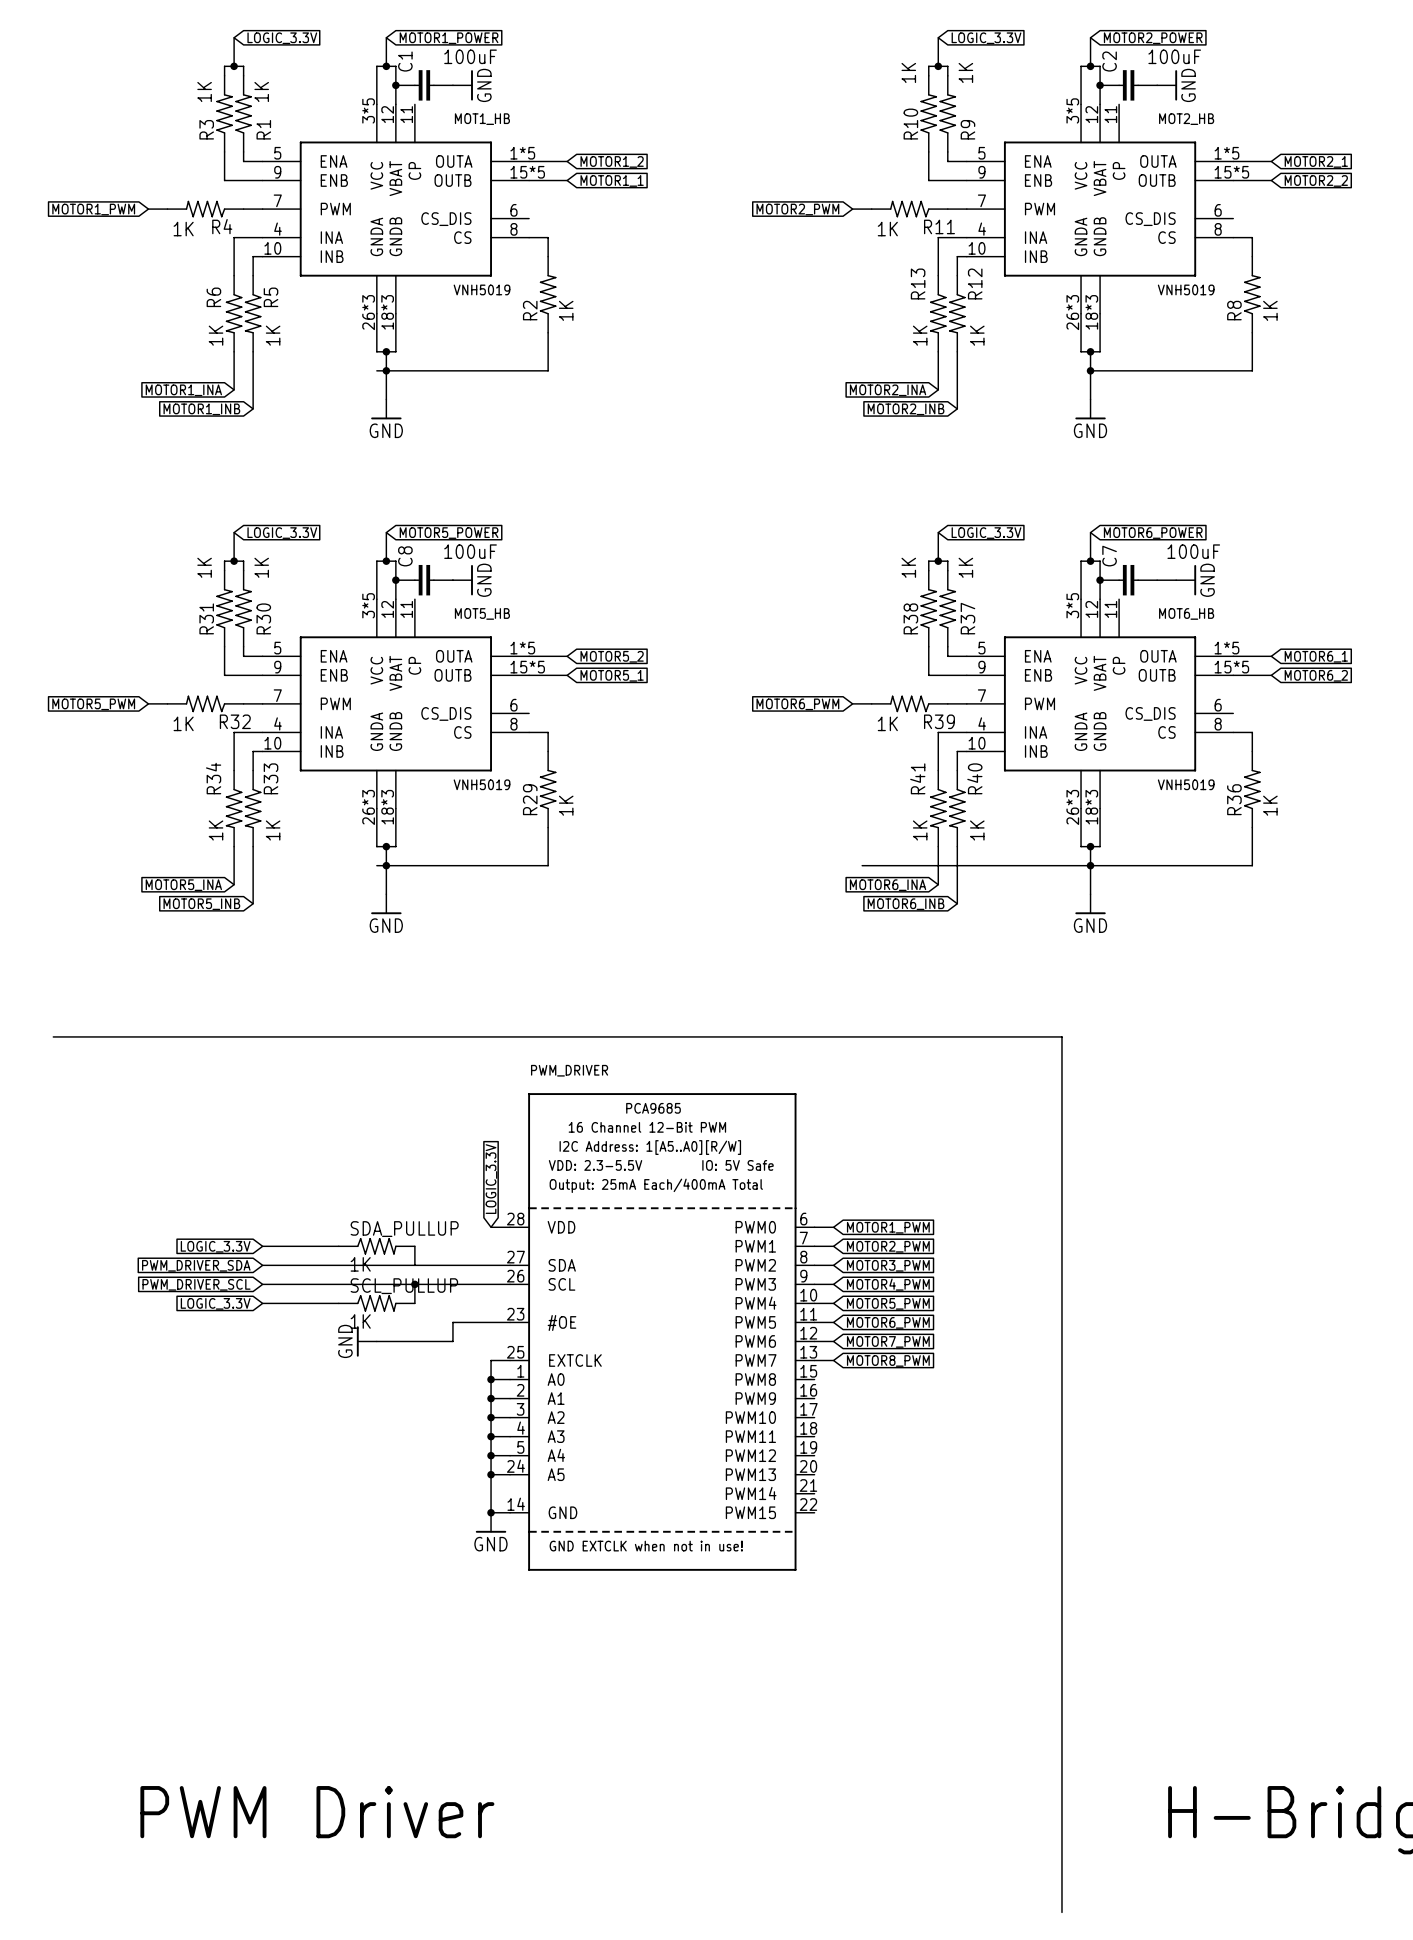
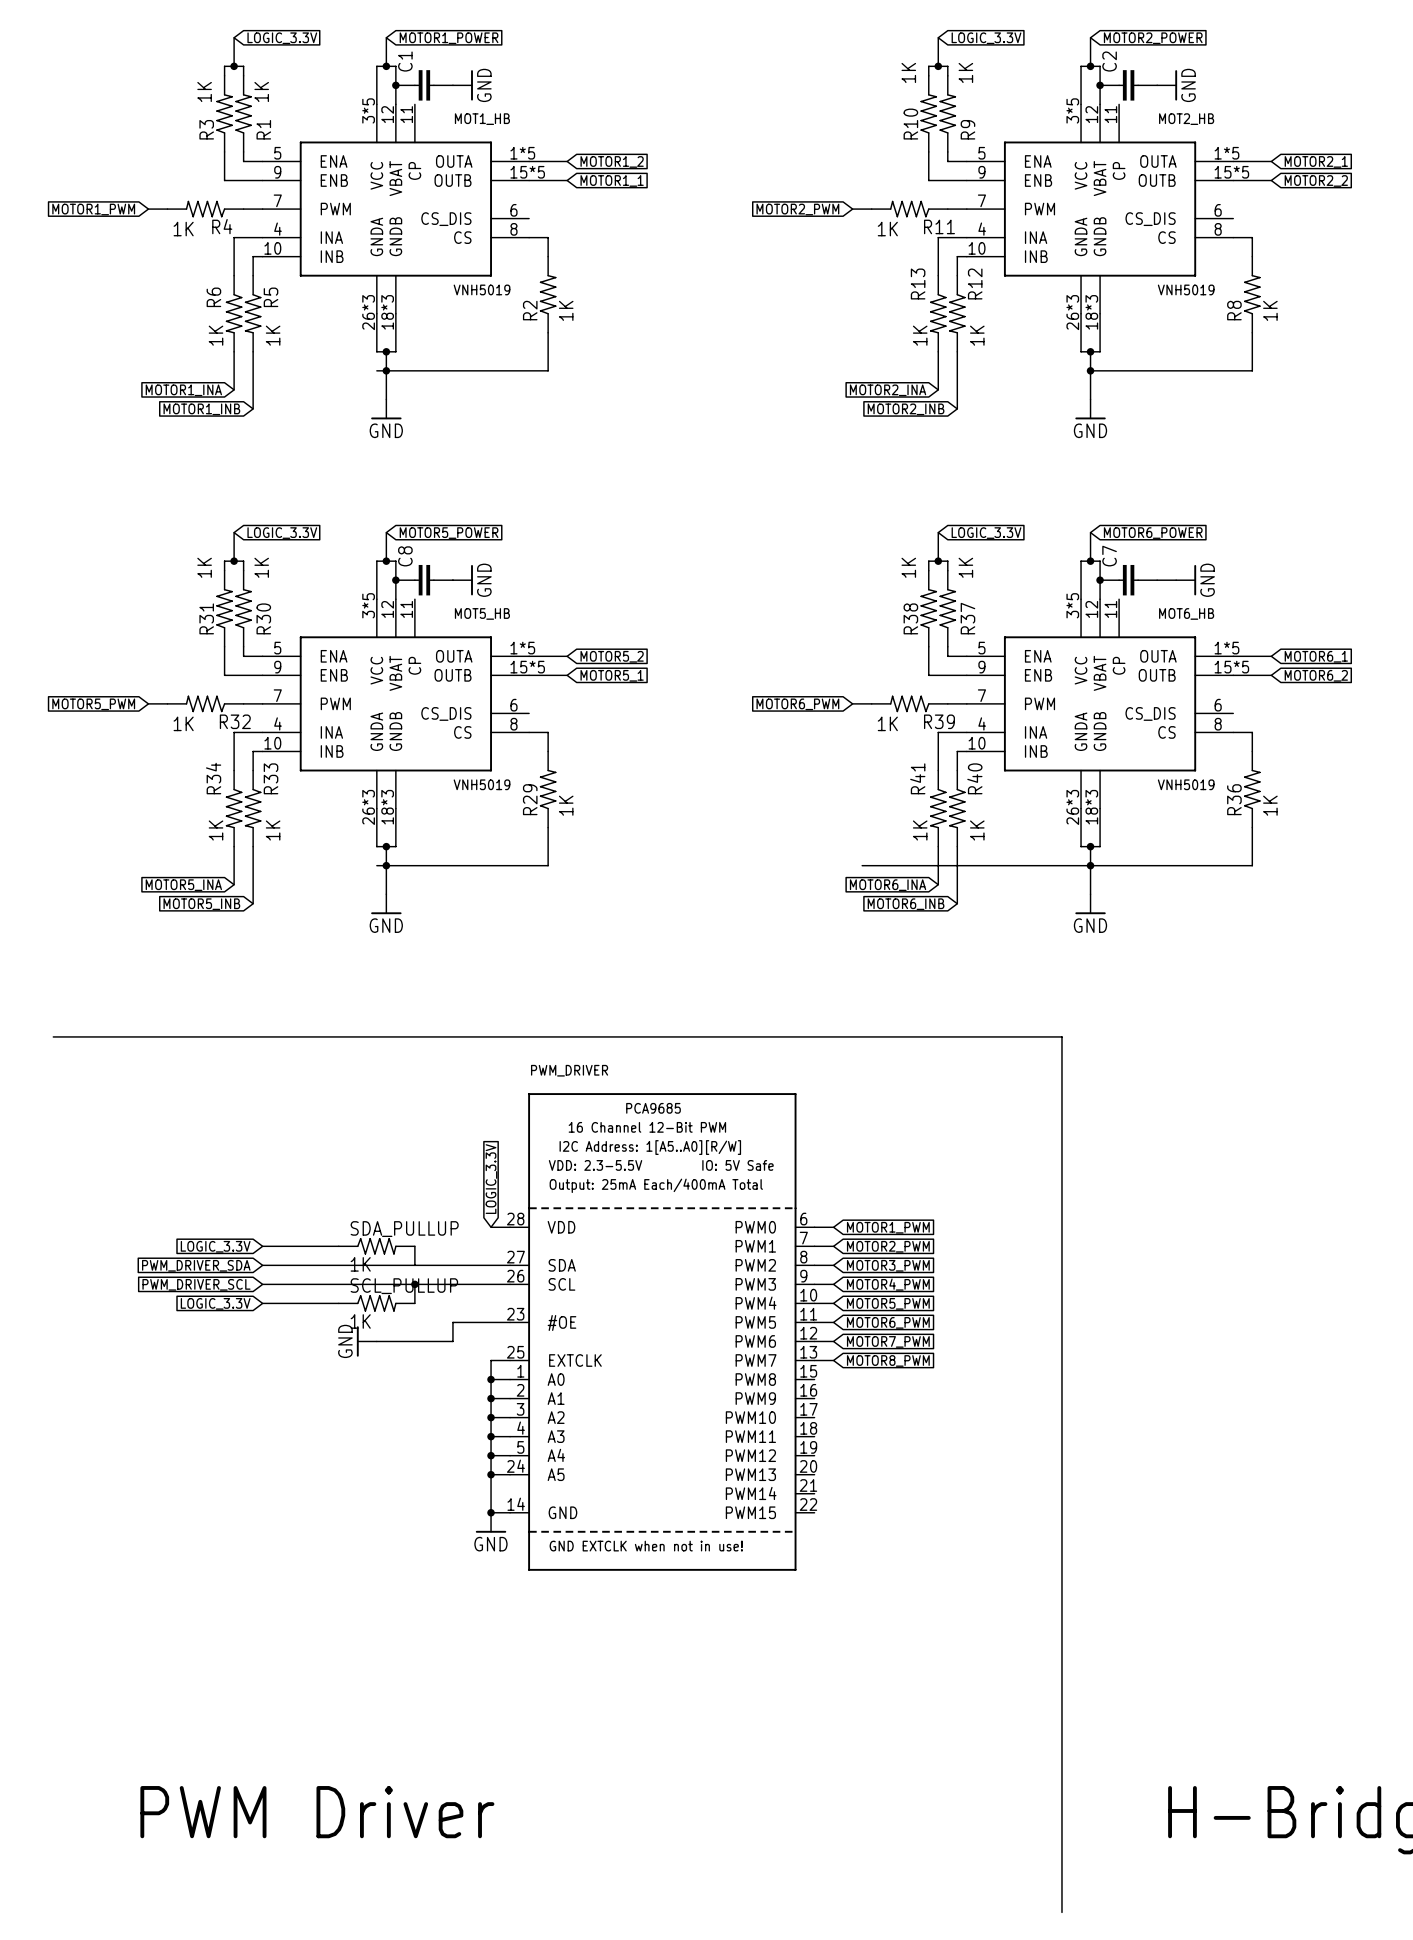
C1 value: 100uF (470, 56) -> none
C2 value: 100uF (1174, 56) -> none
C8 value: 100uF (470, 551) -> none
C7 value: 100uF (1193, 551) -> none

